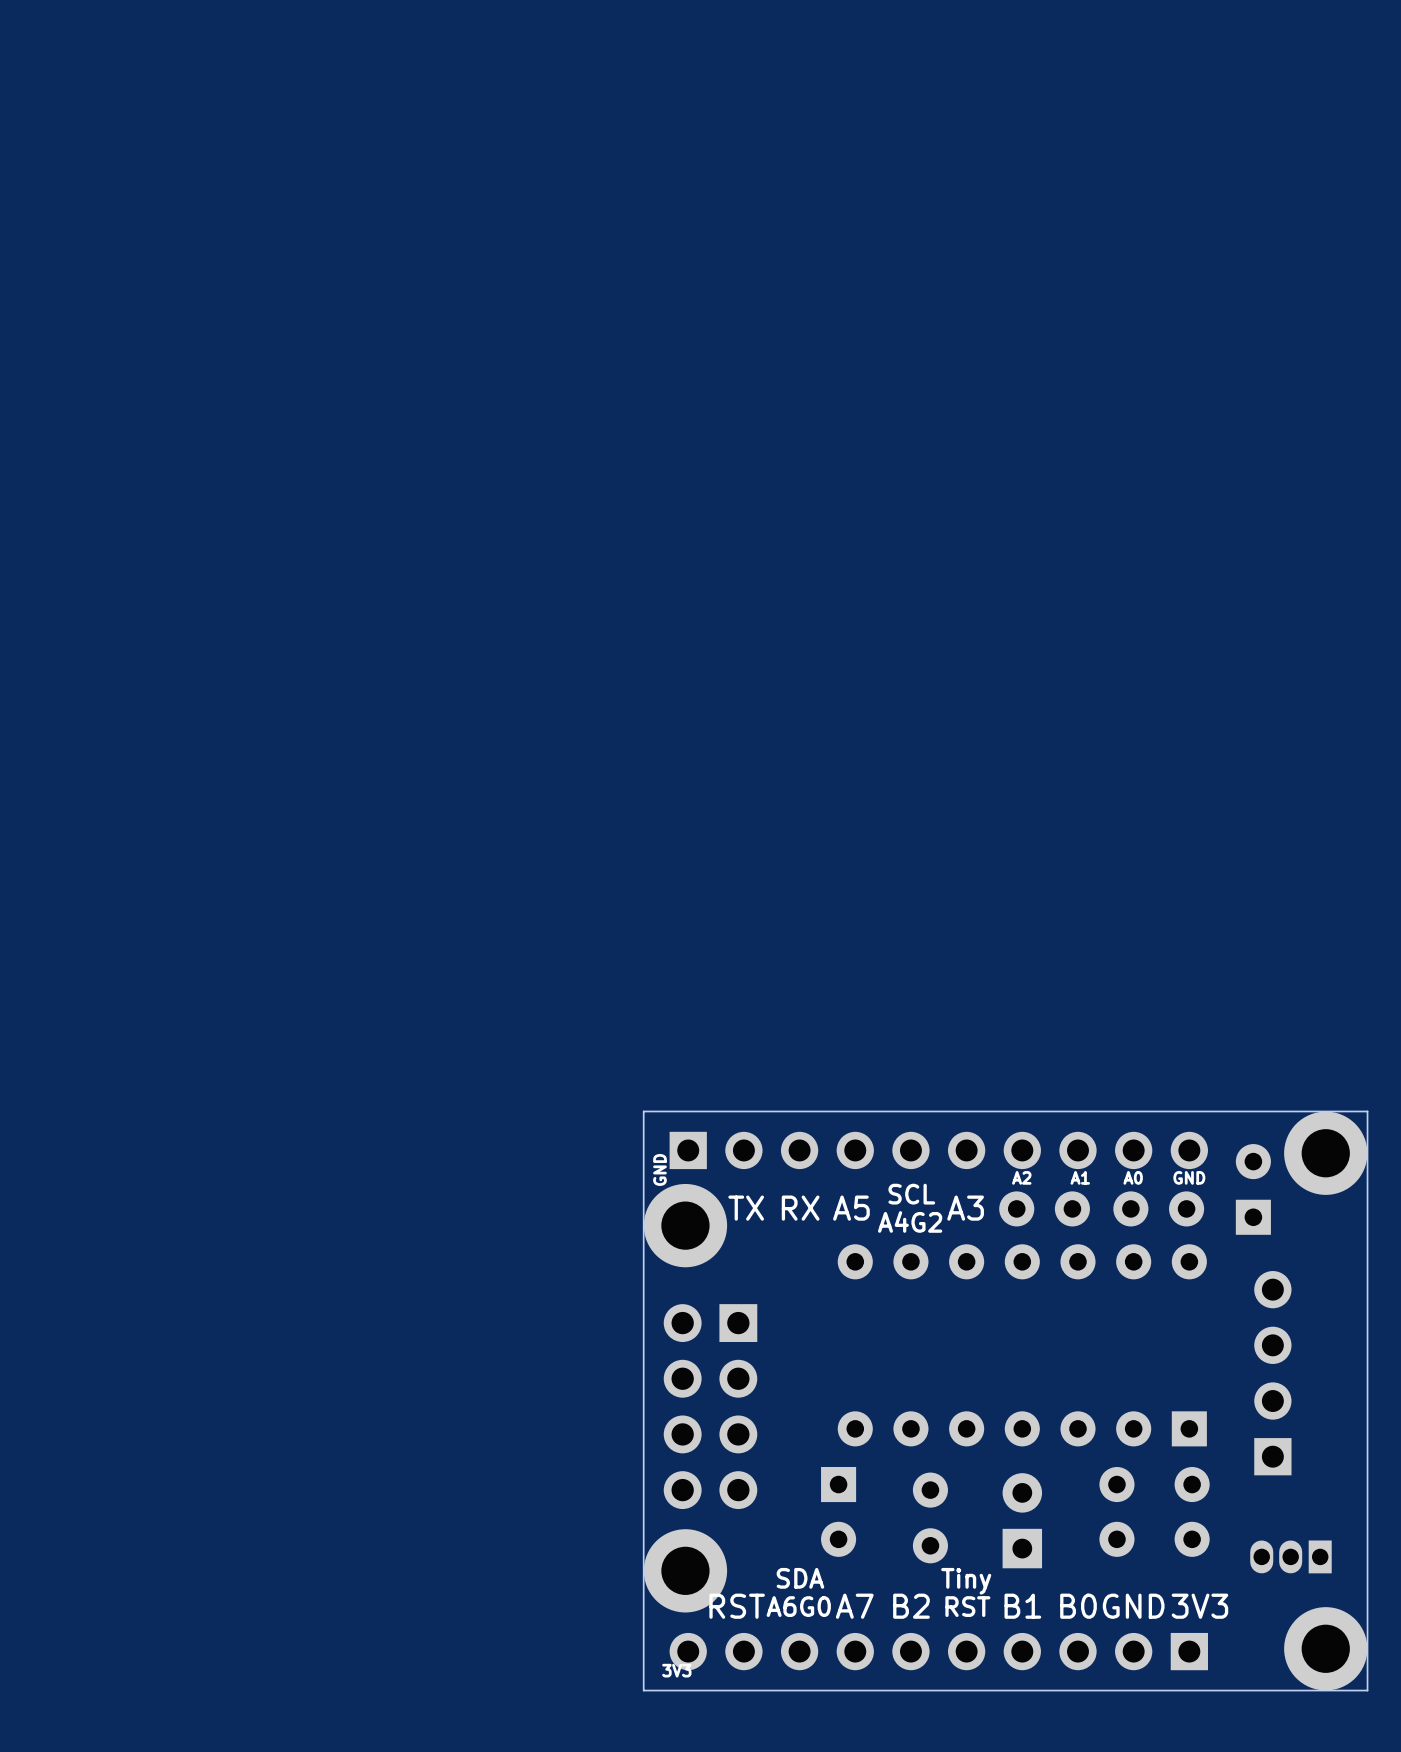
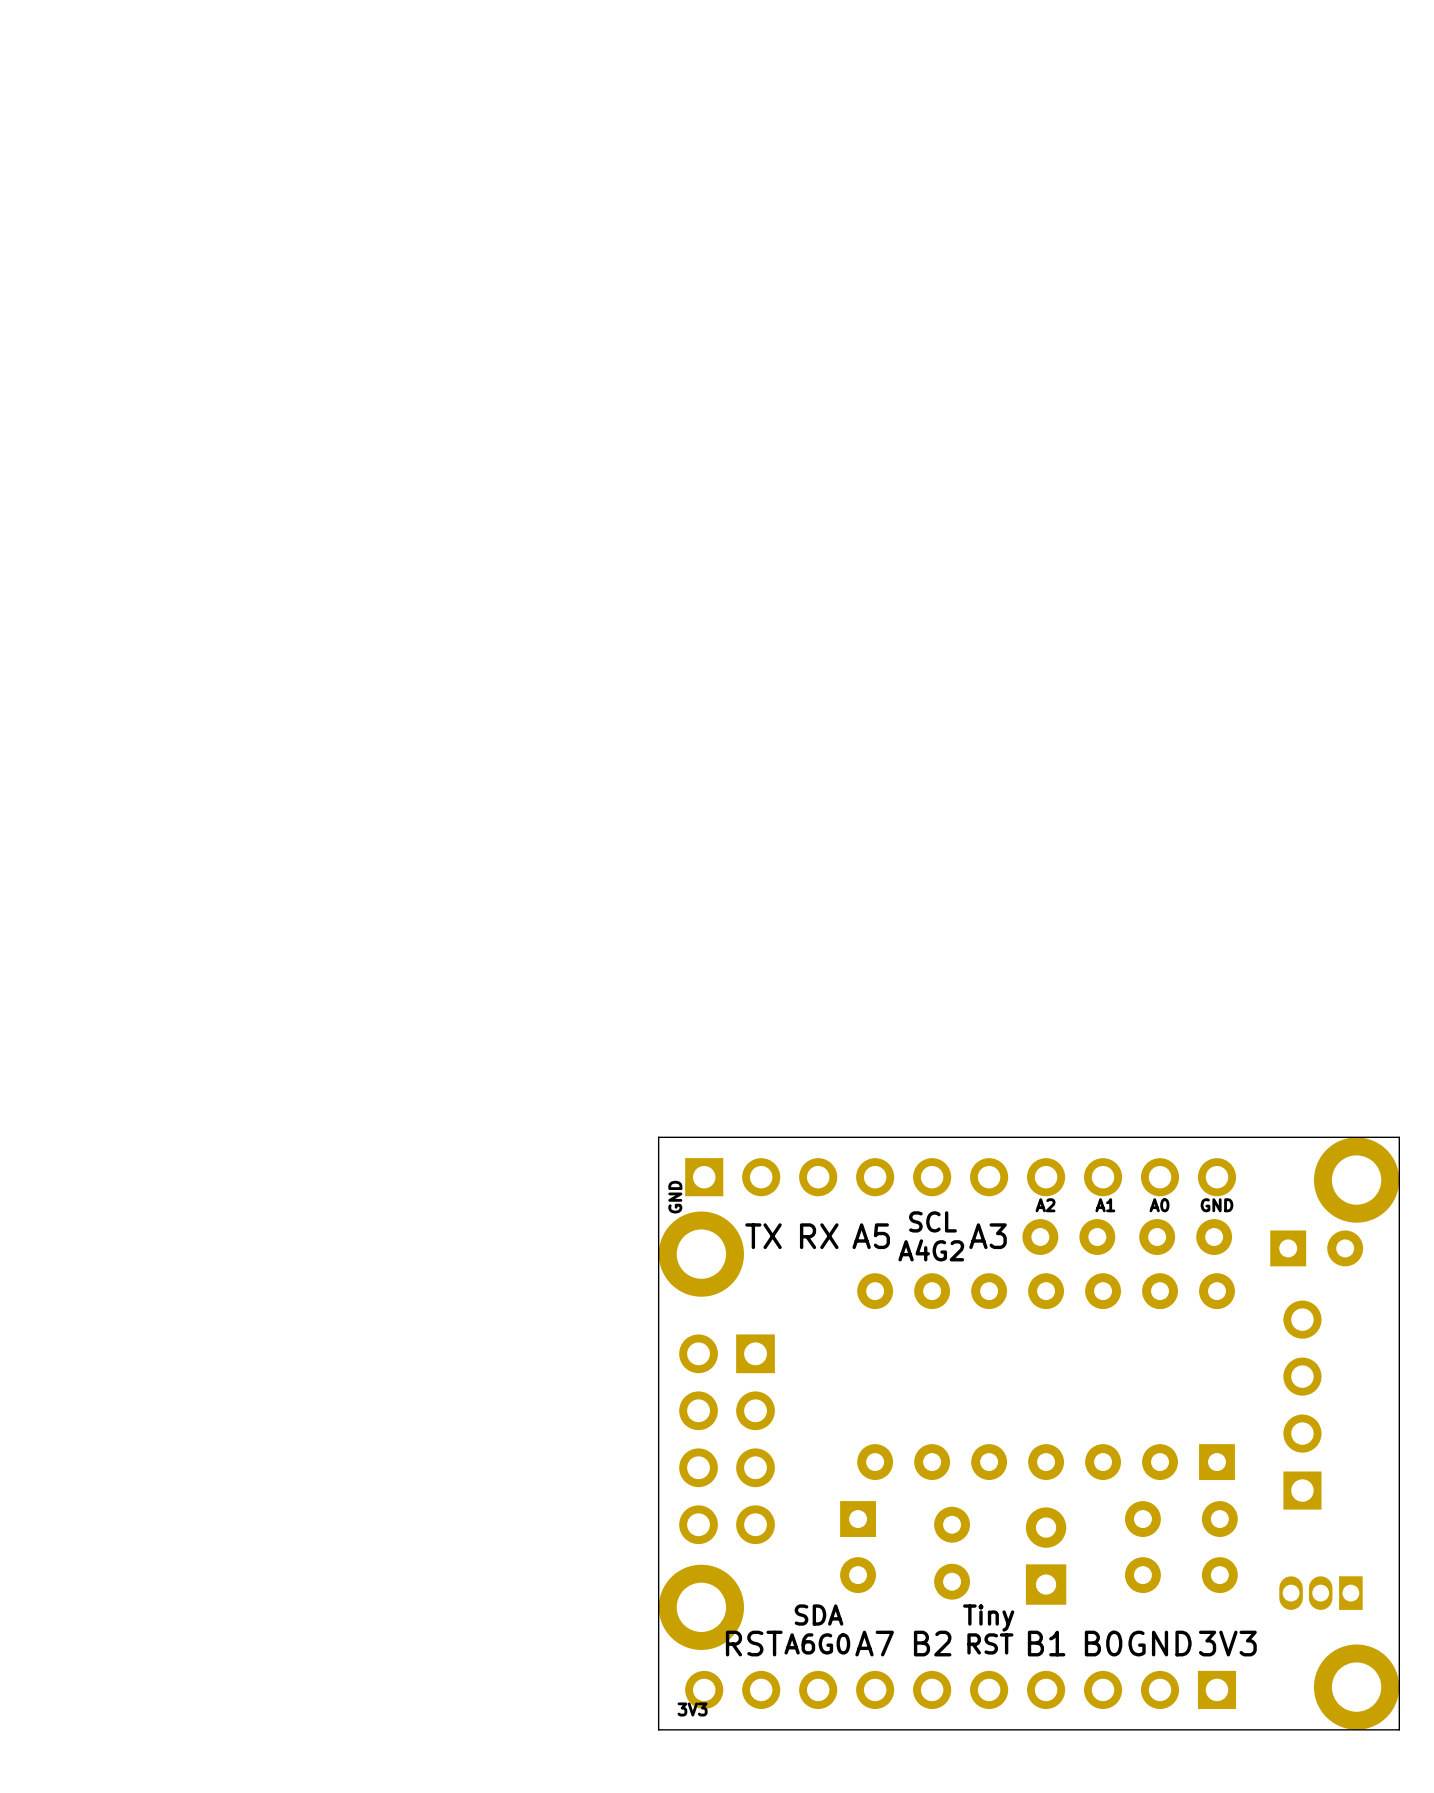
part rotation: 0° (1253, 1189) -> 90° clockwise (1316, 1248)

